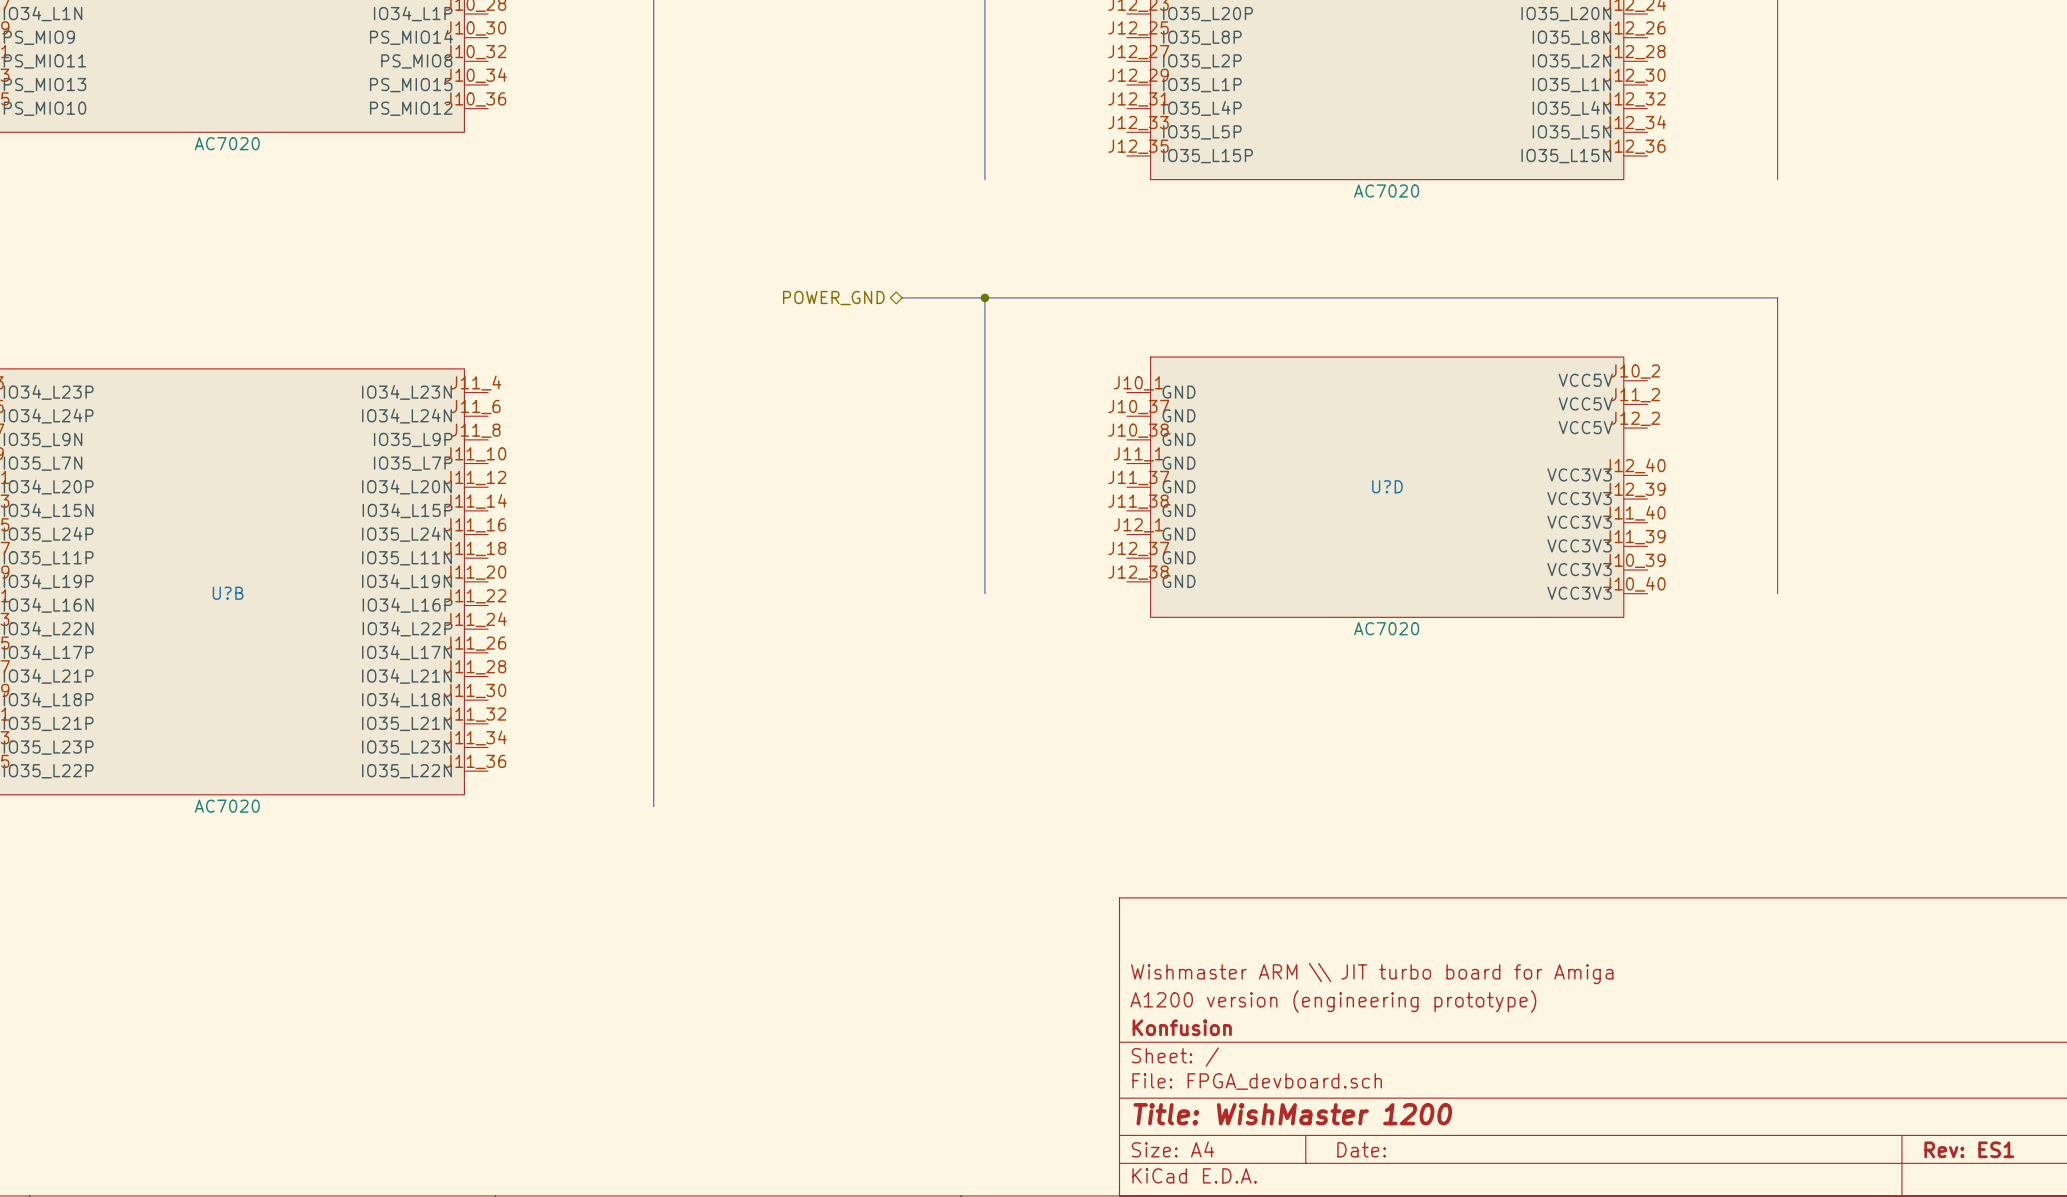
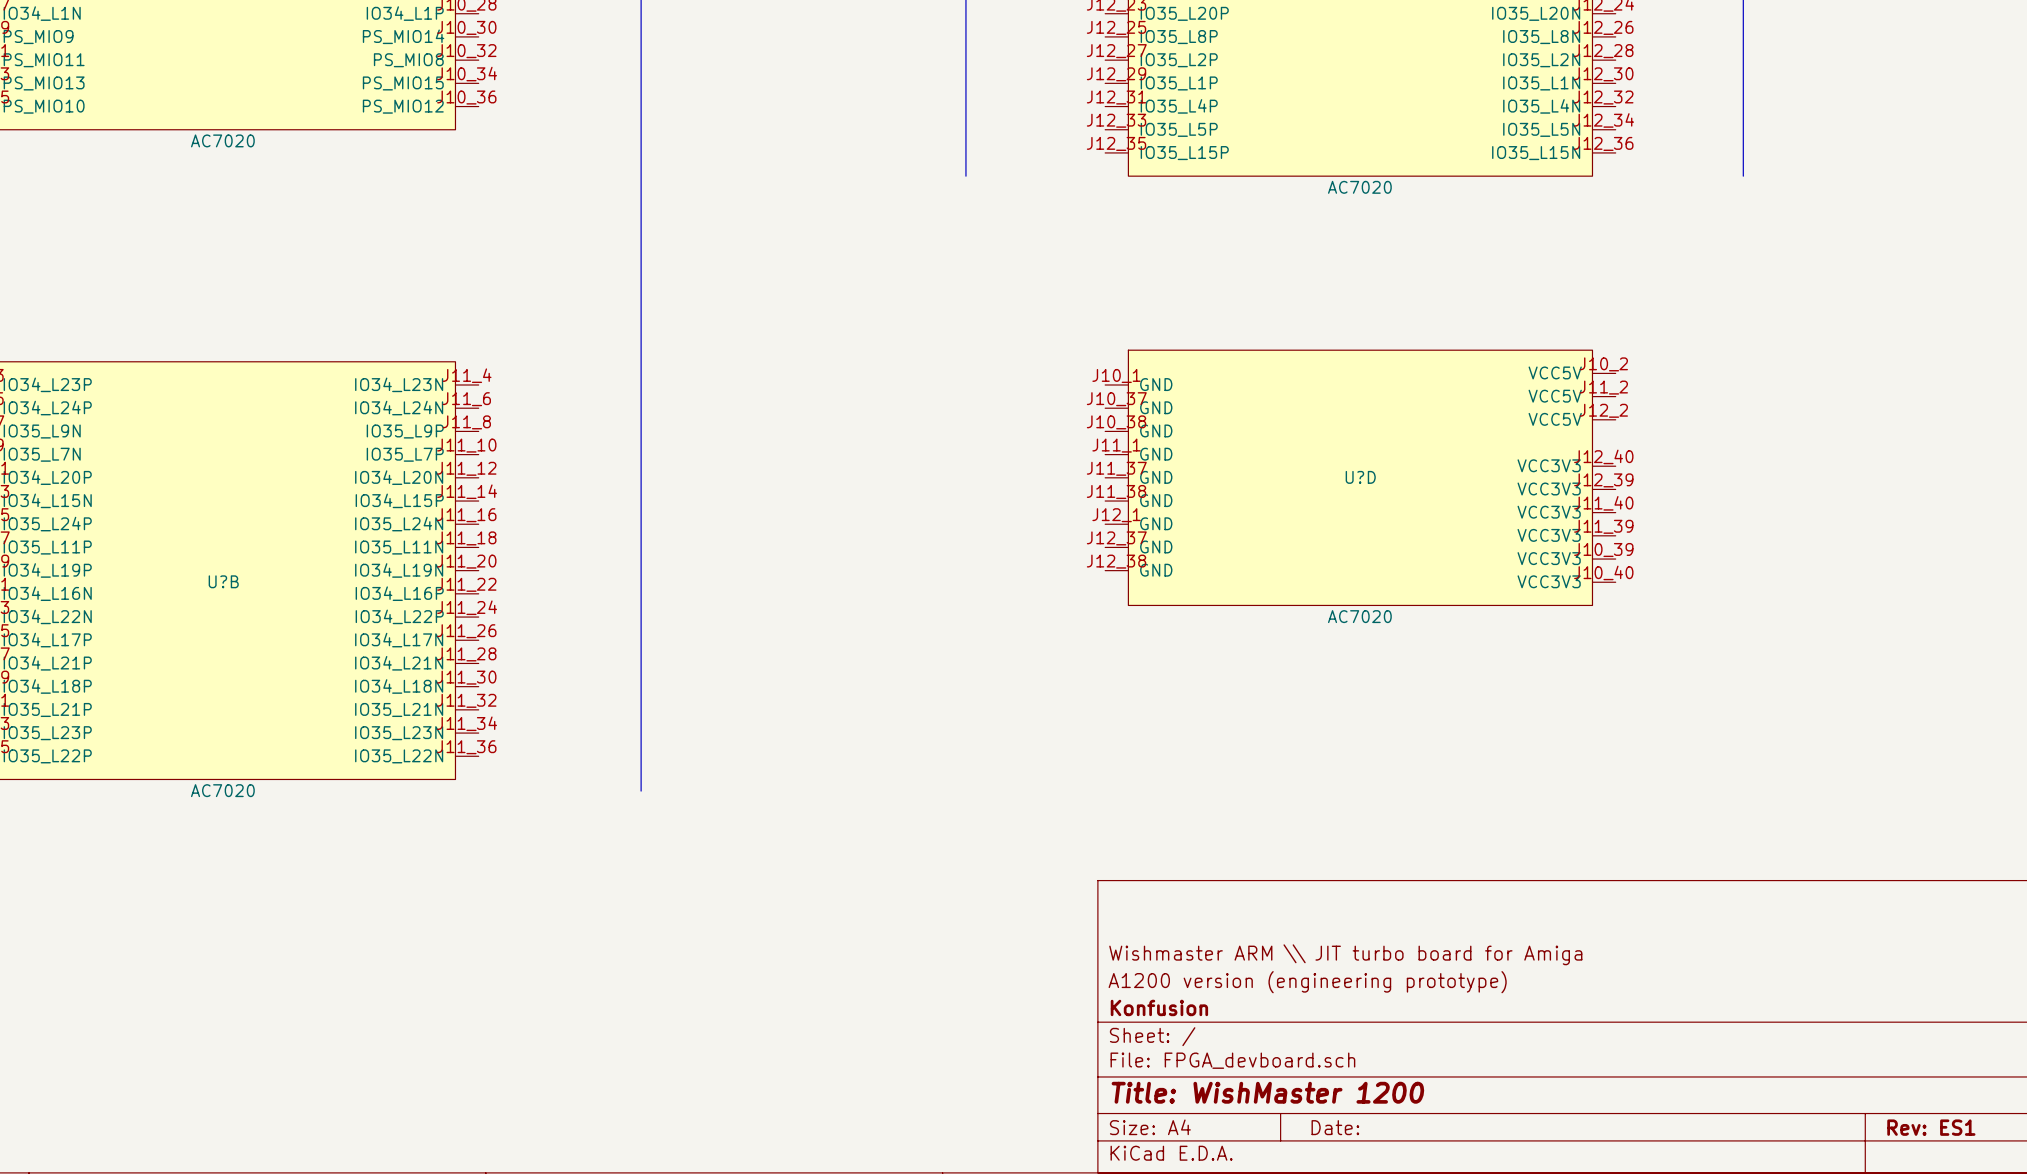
bus: (902, 297) (1777, 297) (1777, 593) -> none
bus: (984, 297) (984, 593) -> none
junction: (984, 297) -> none
hierarchical label: POWER_GND (833, 298) -> none

